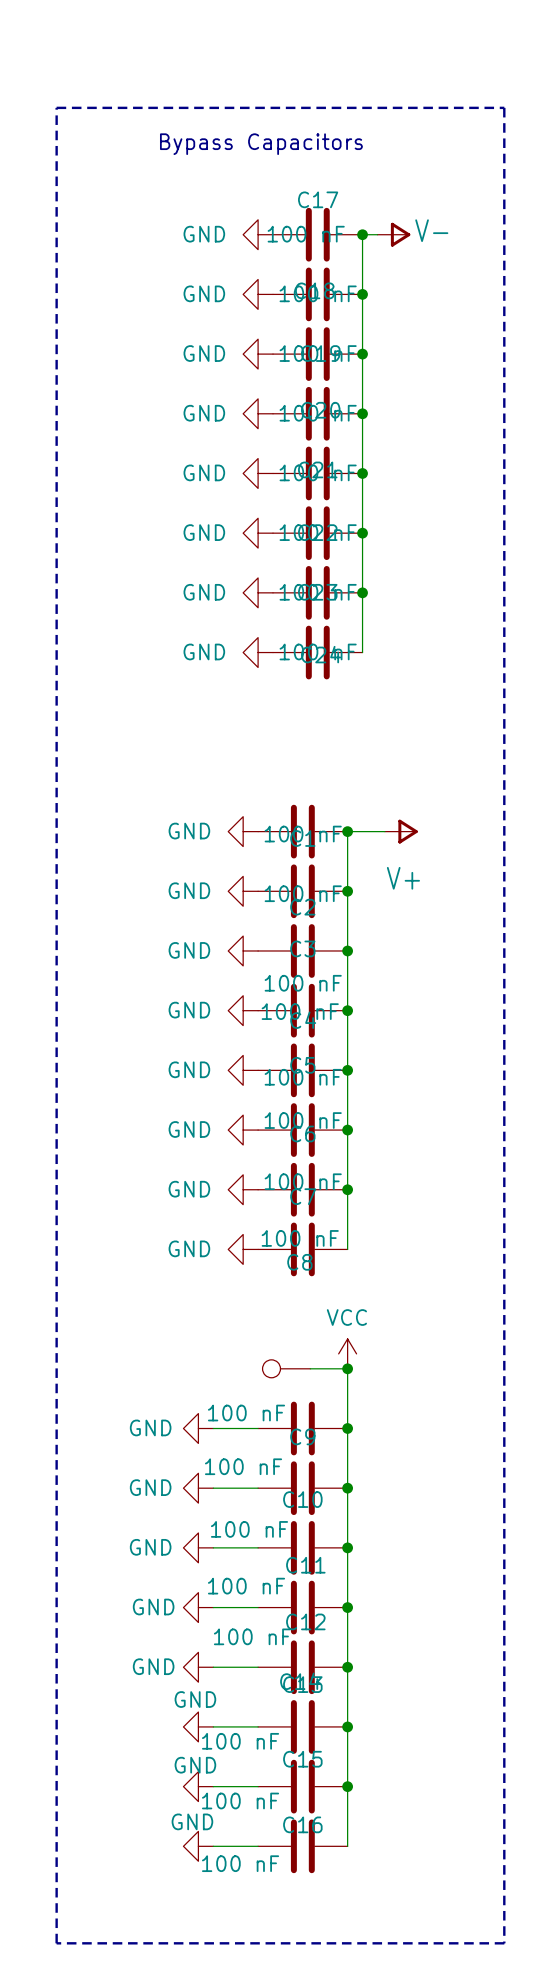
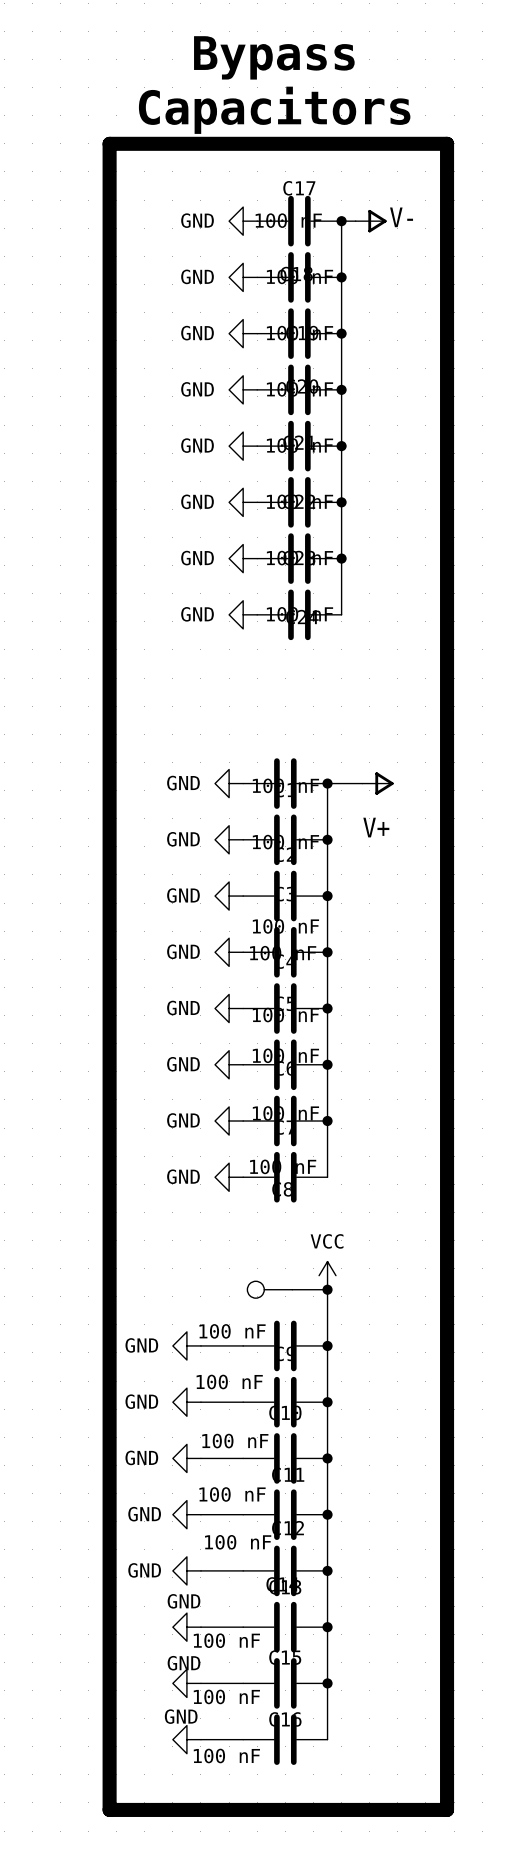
text: none -> Bypass (274, 57)
line: (56, 107) (504, 107) (504, 1943) (56, 1943) (56, 107) -> (109, 143) (109, 1809) (447, 1809) (447, 143) (109, 143)
text: Bypass Capacitors (261, 144) -> Capacitors (274, 110)

